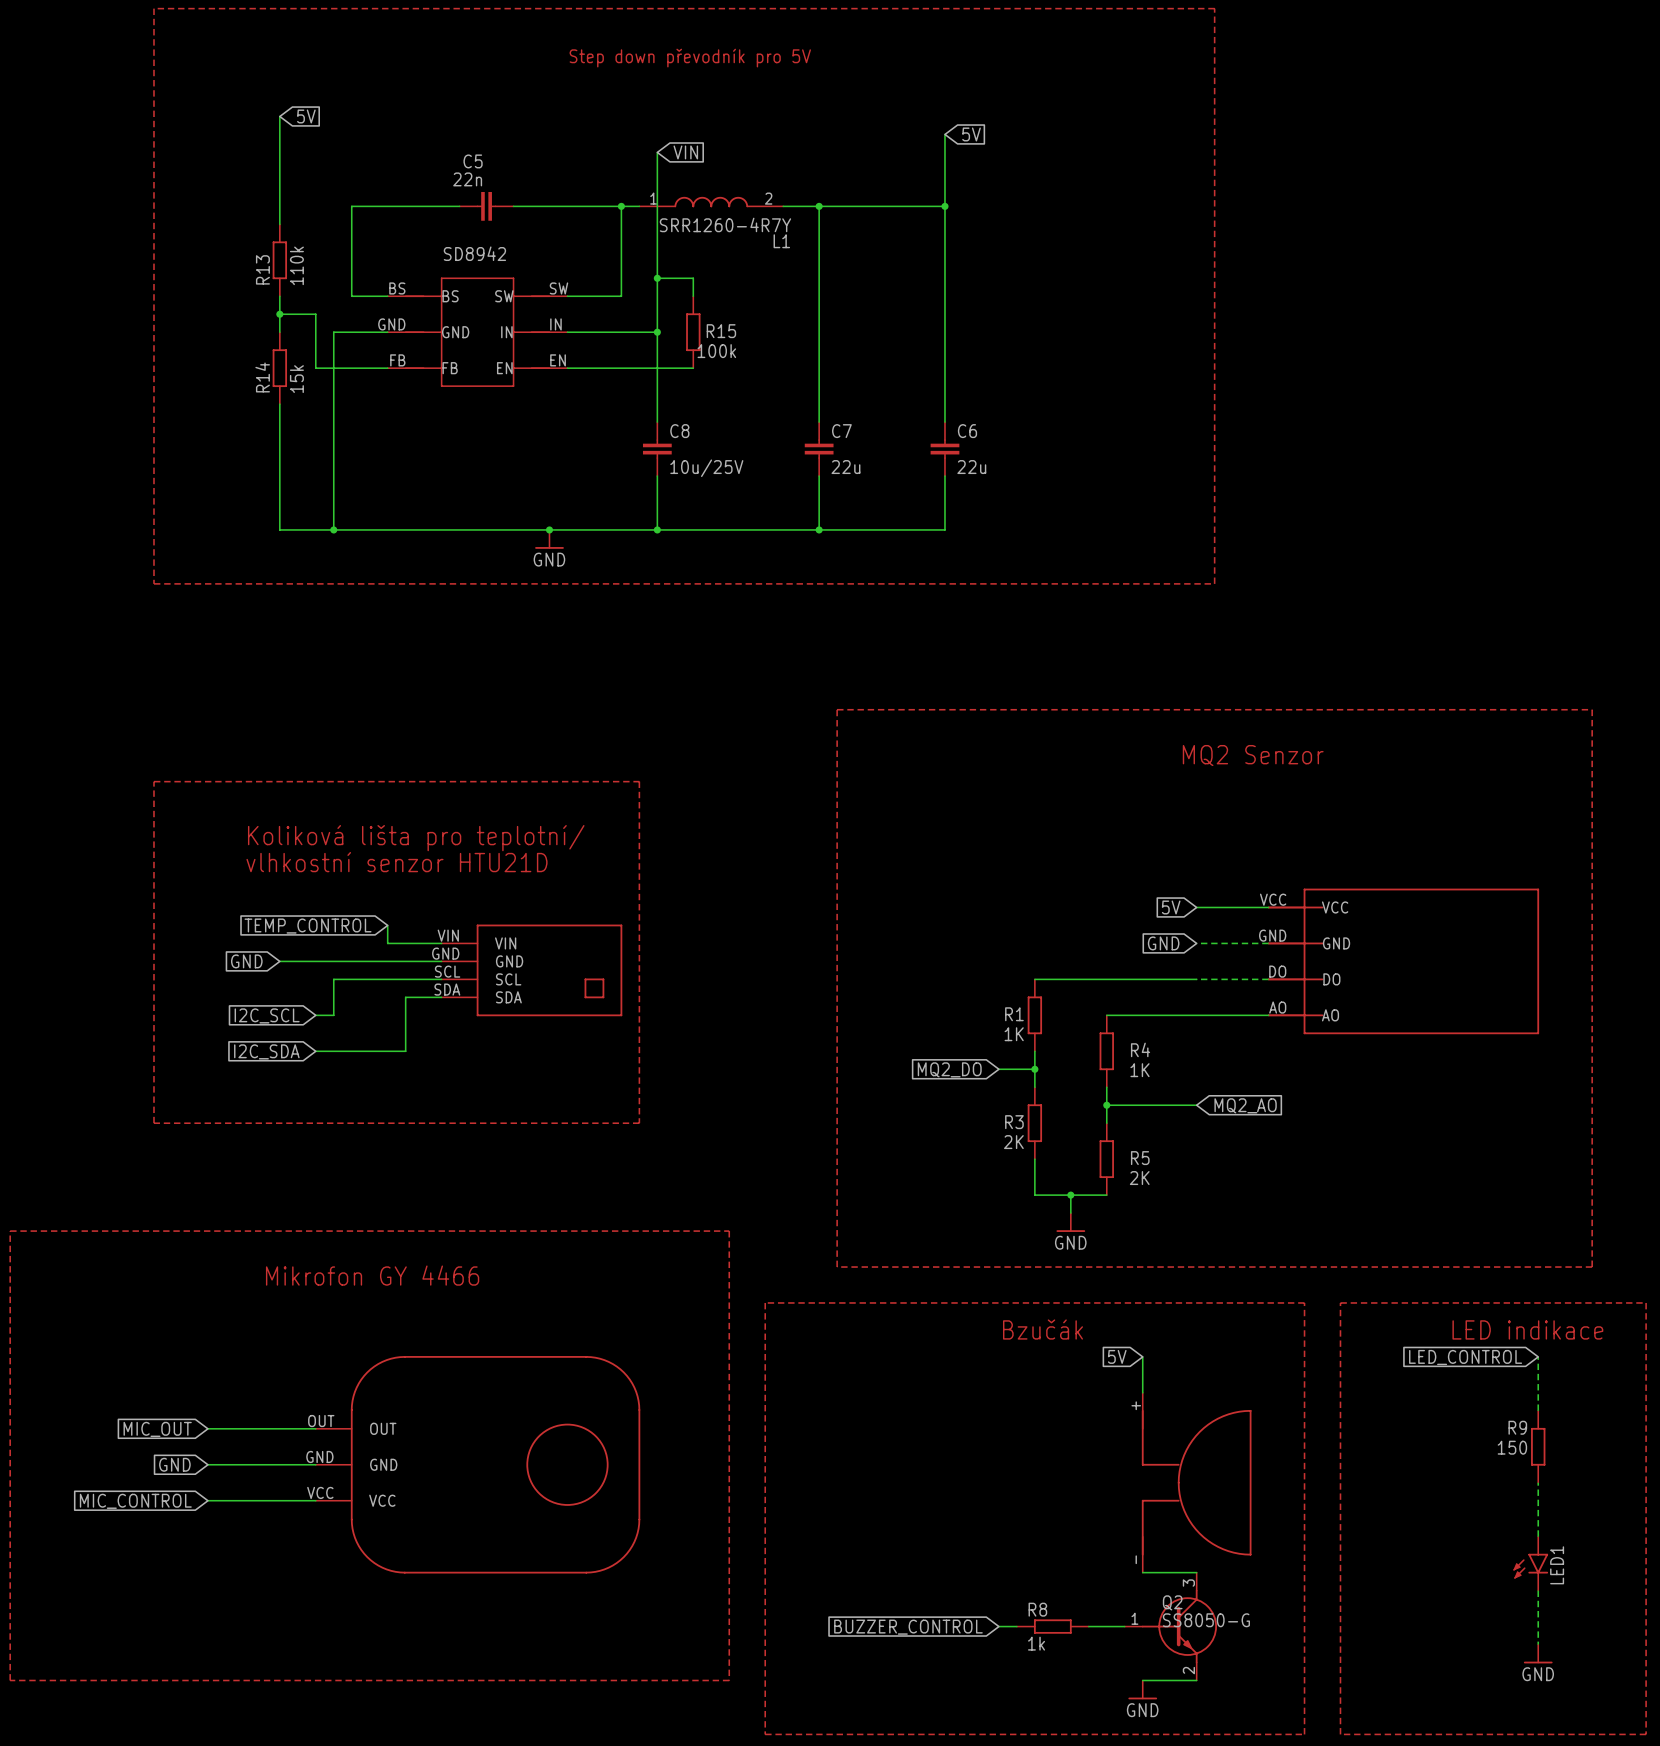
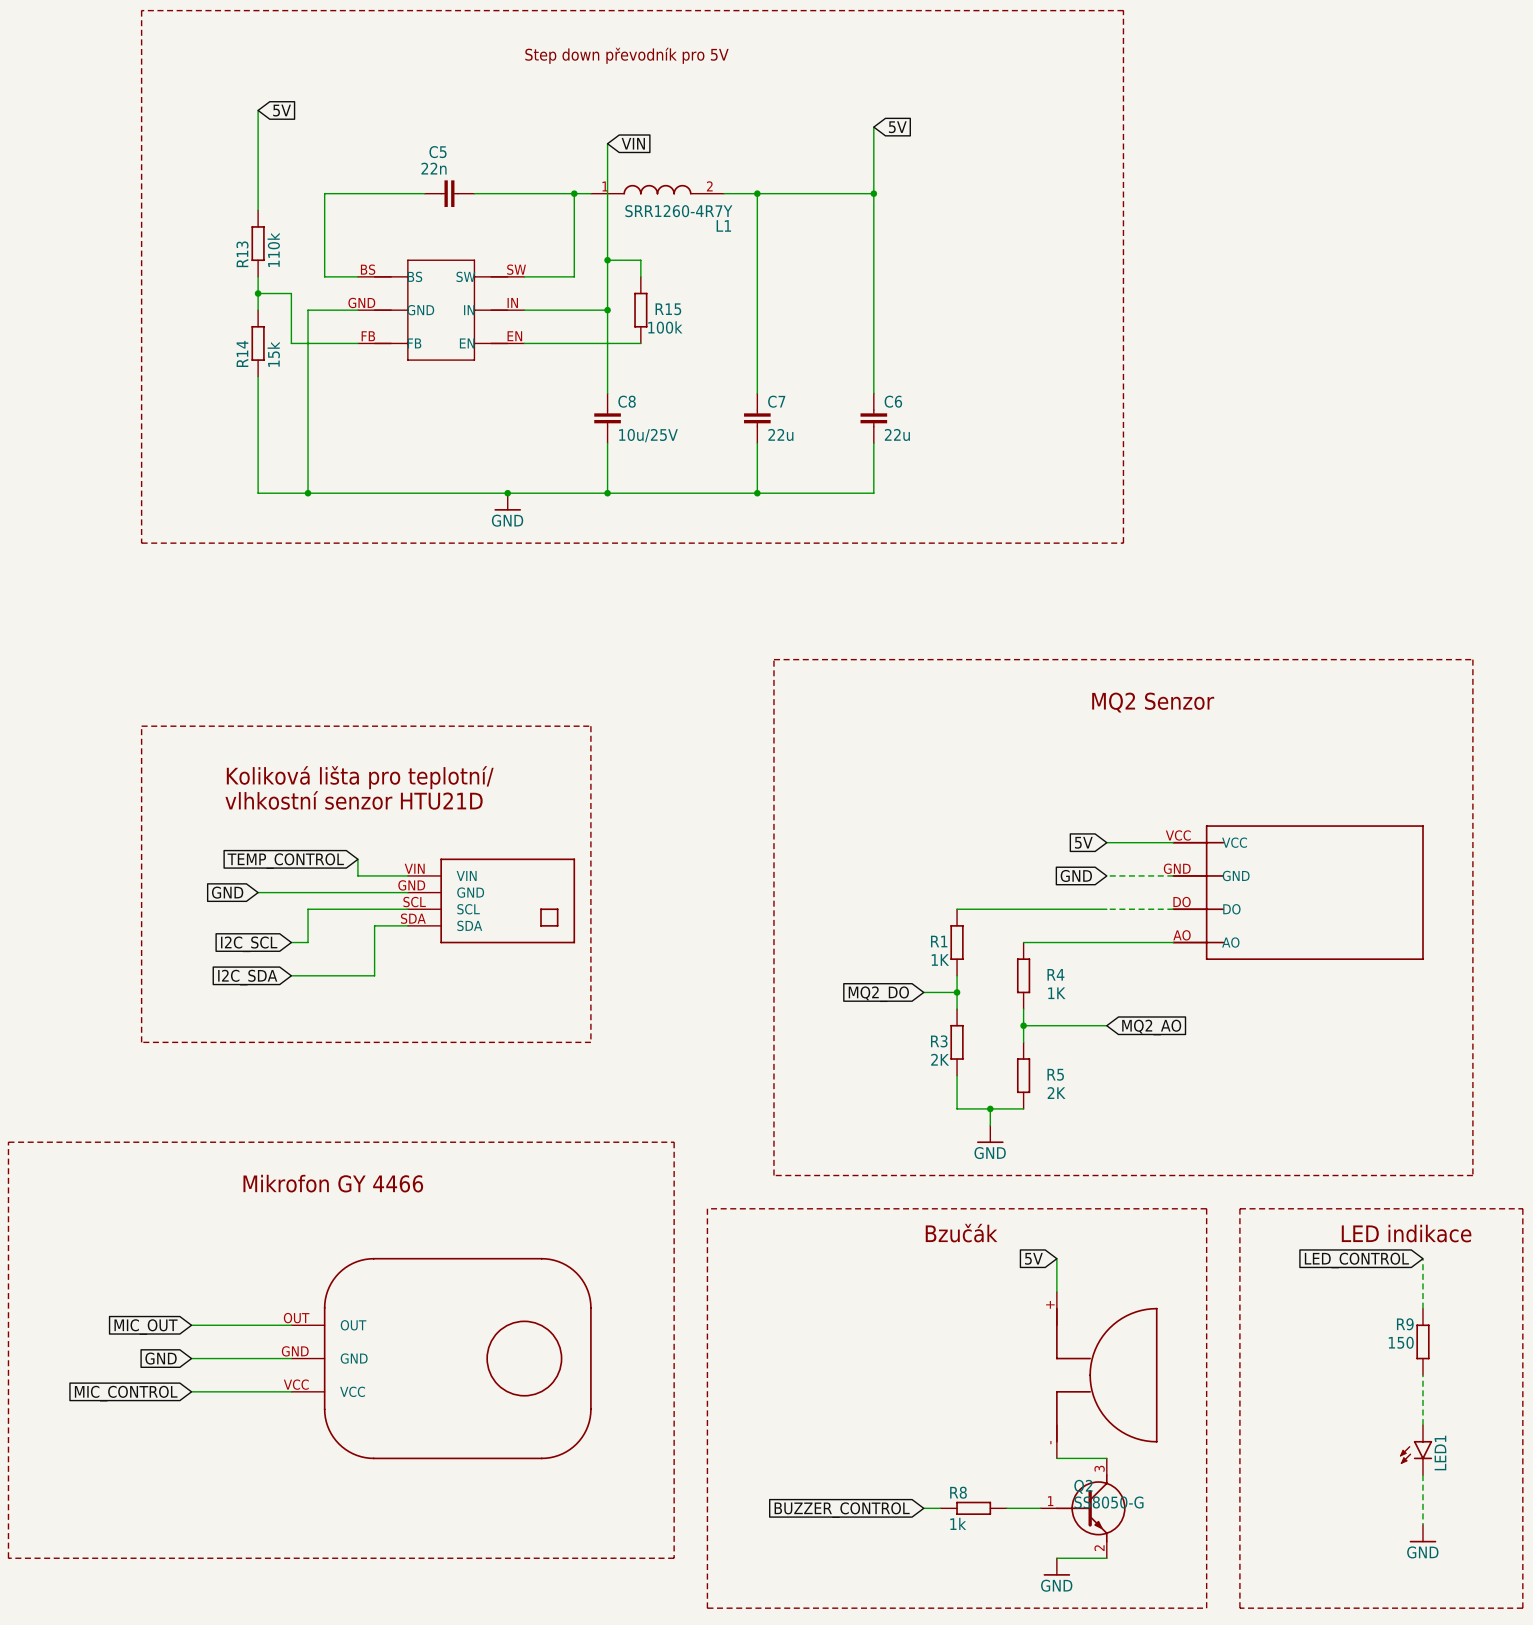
text: SD8942 (474, 253) -> none

